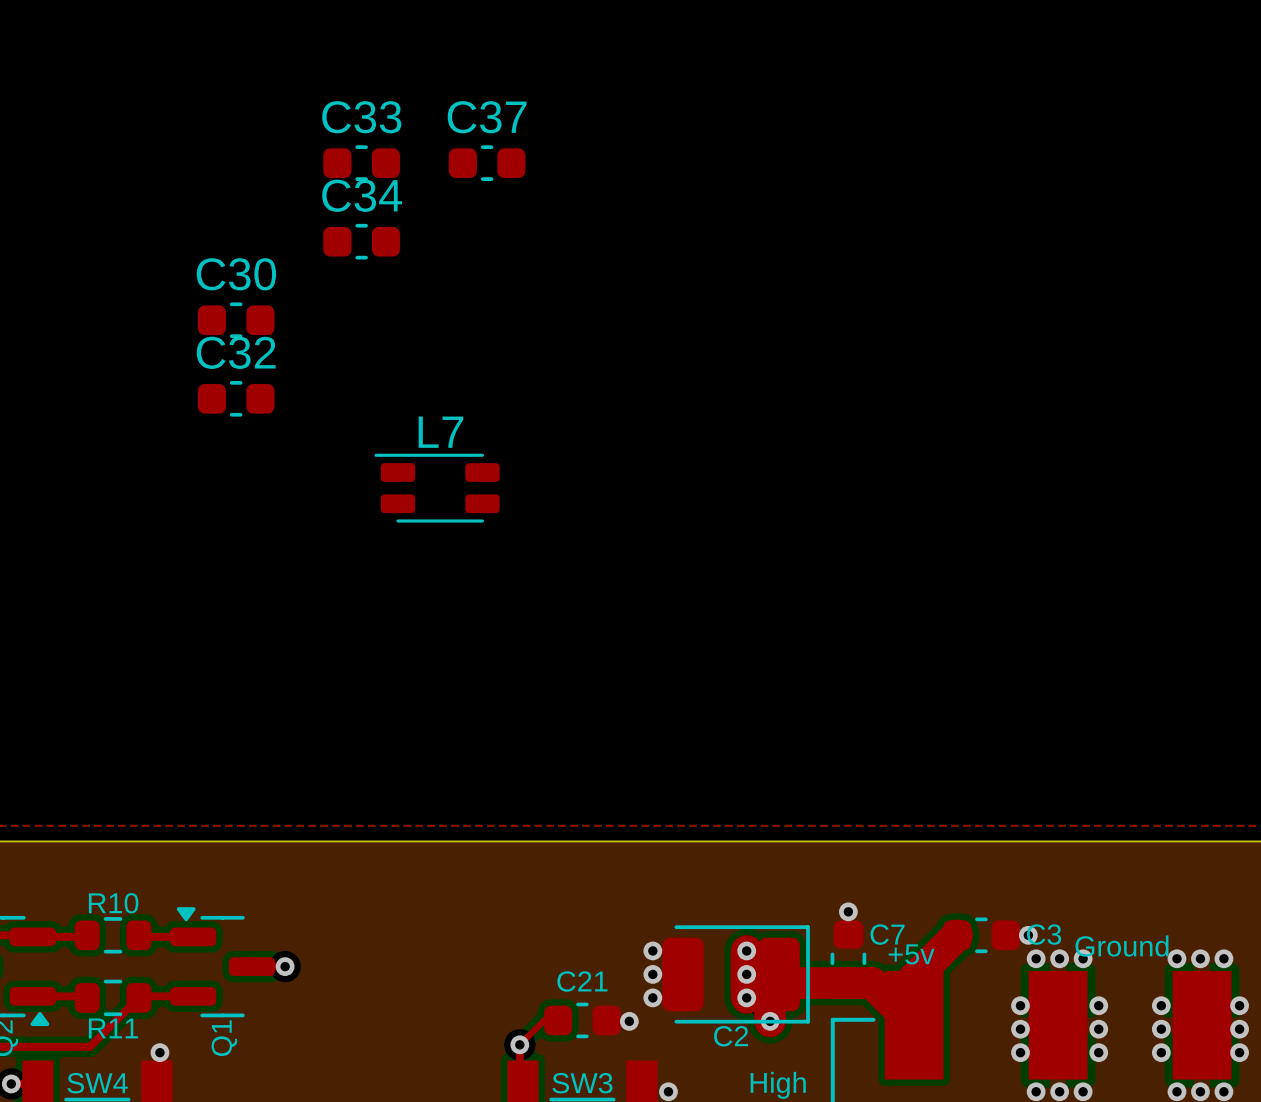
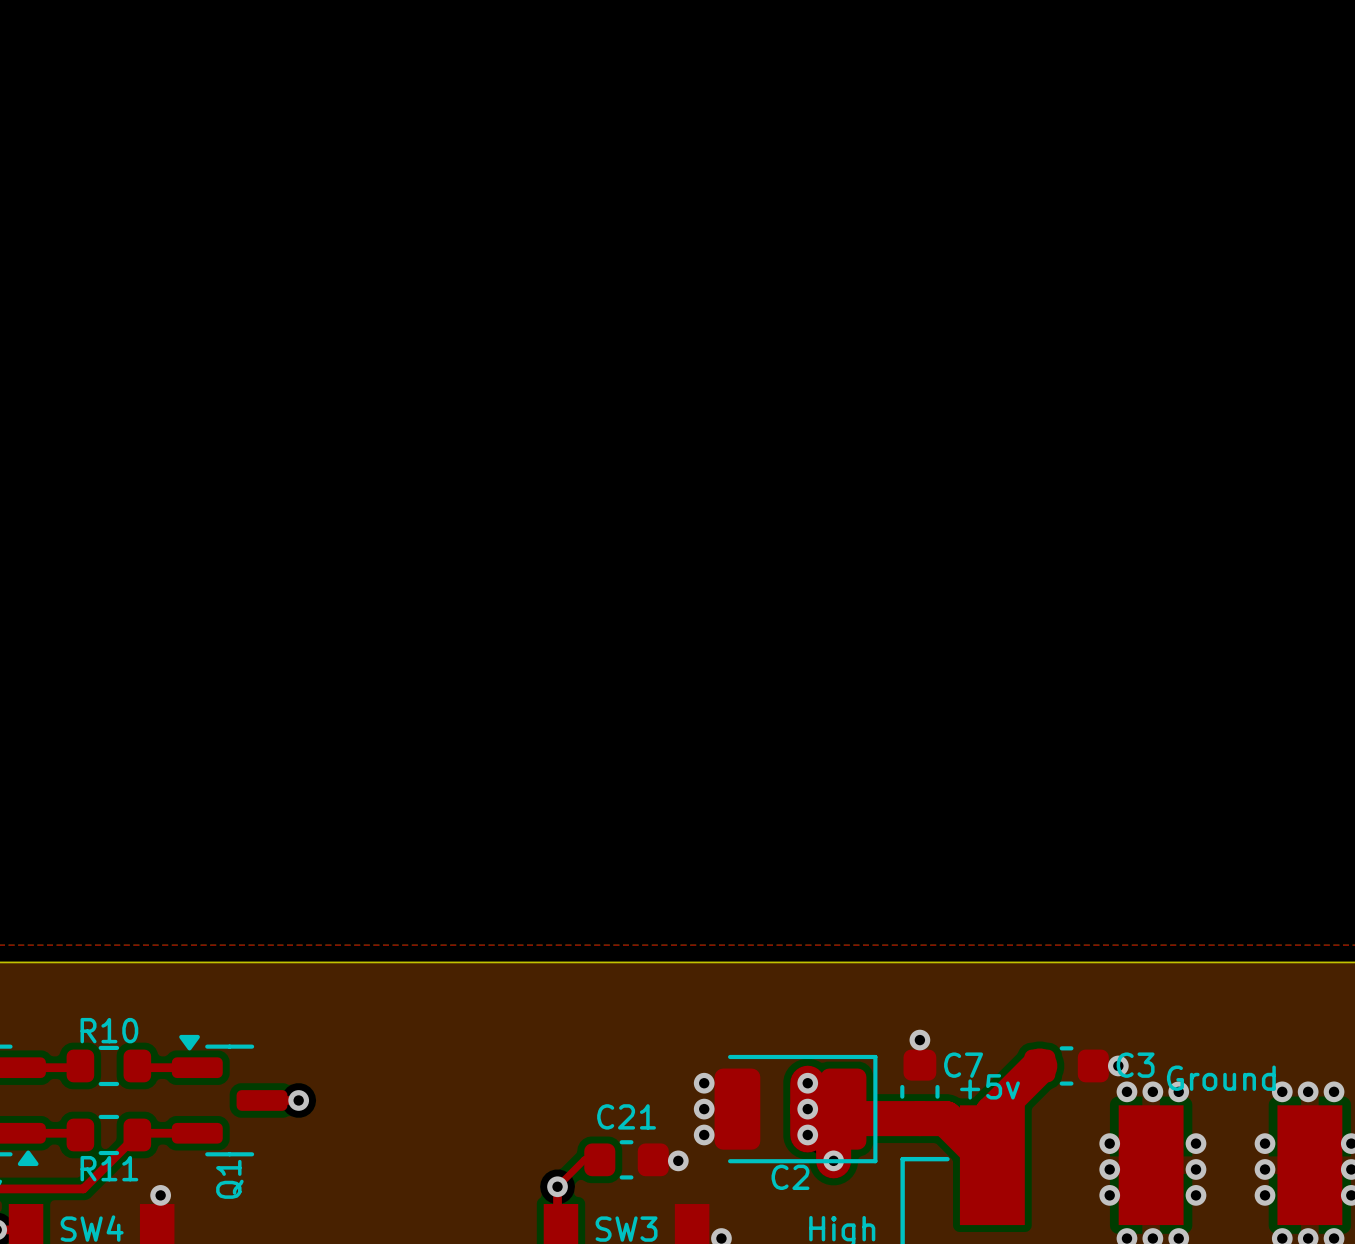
C33: (361, 163) -> none
C37: (487, 163) -> none
C34: (361, 241) -> none
C30: (236, 320) -> none
C32: (236, 398) -> none
L7: (437, 488) -> none

